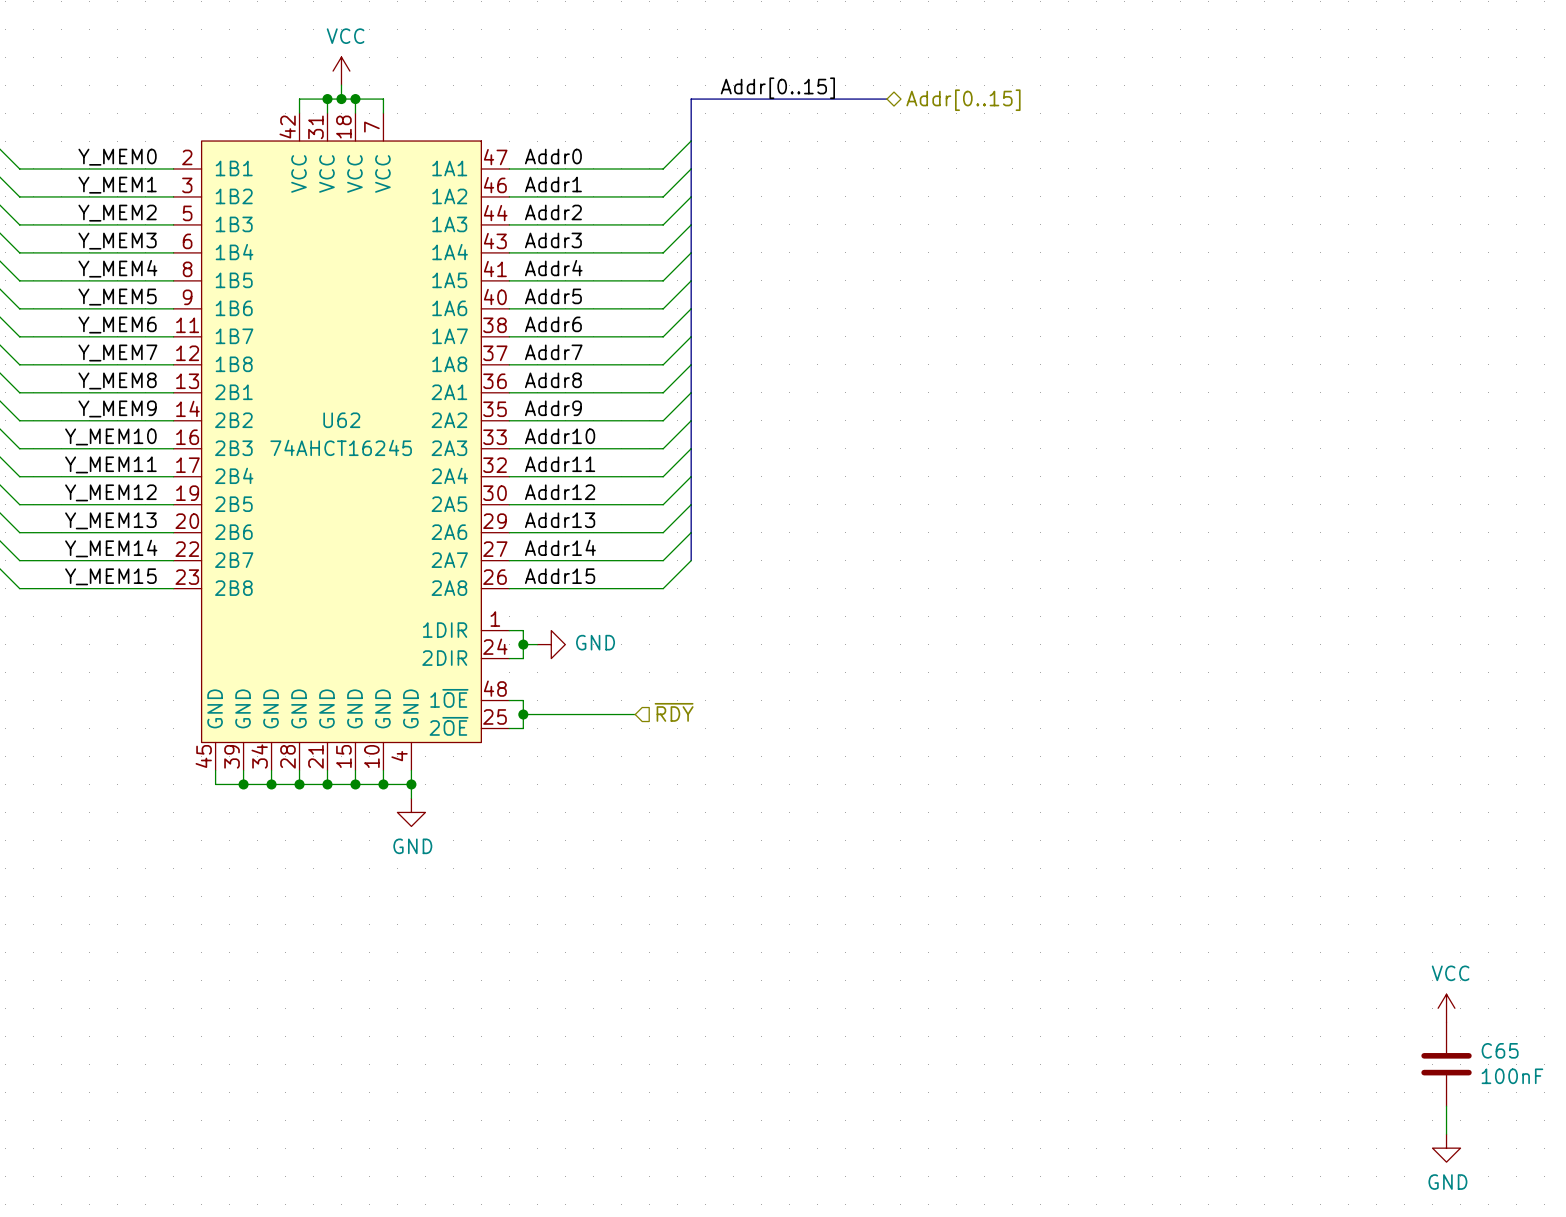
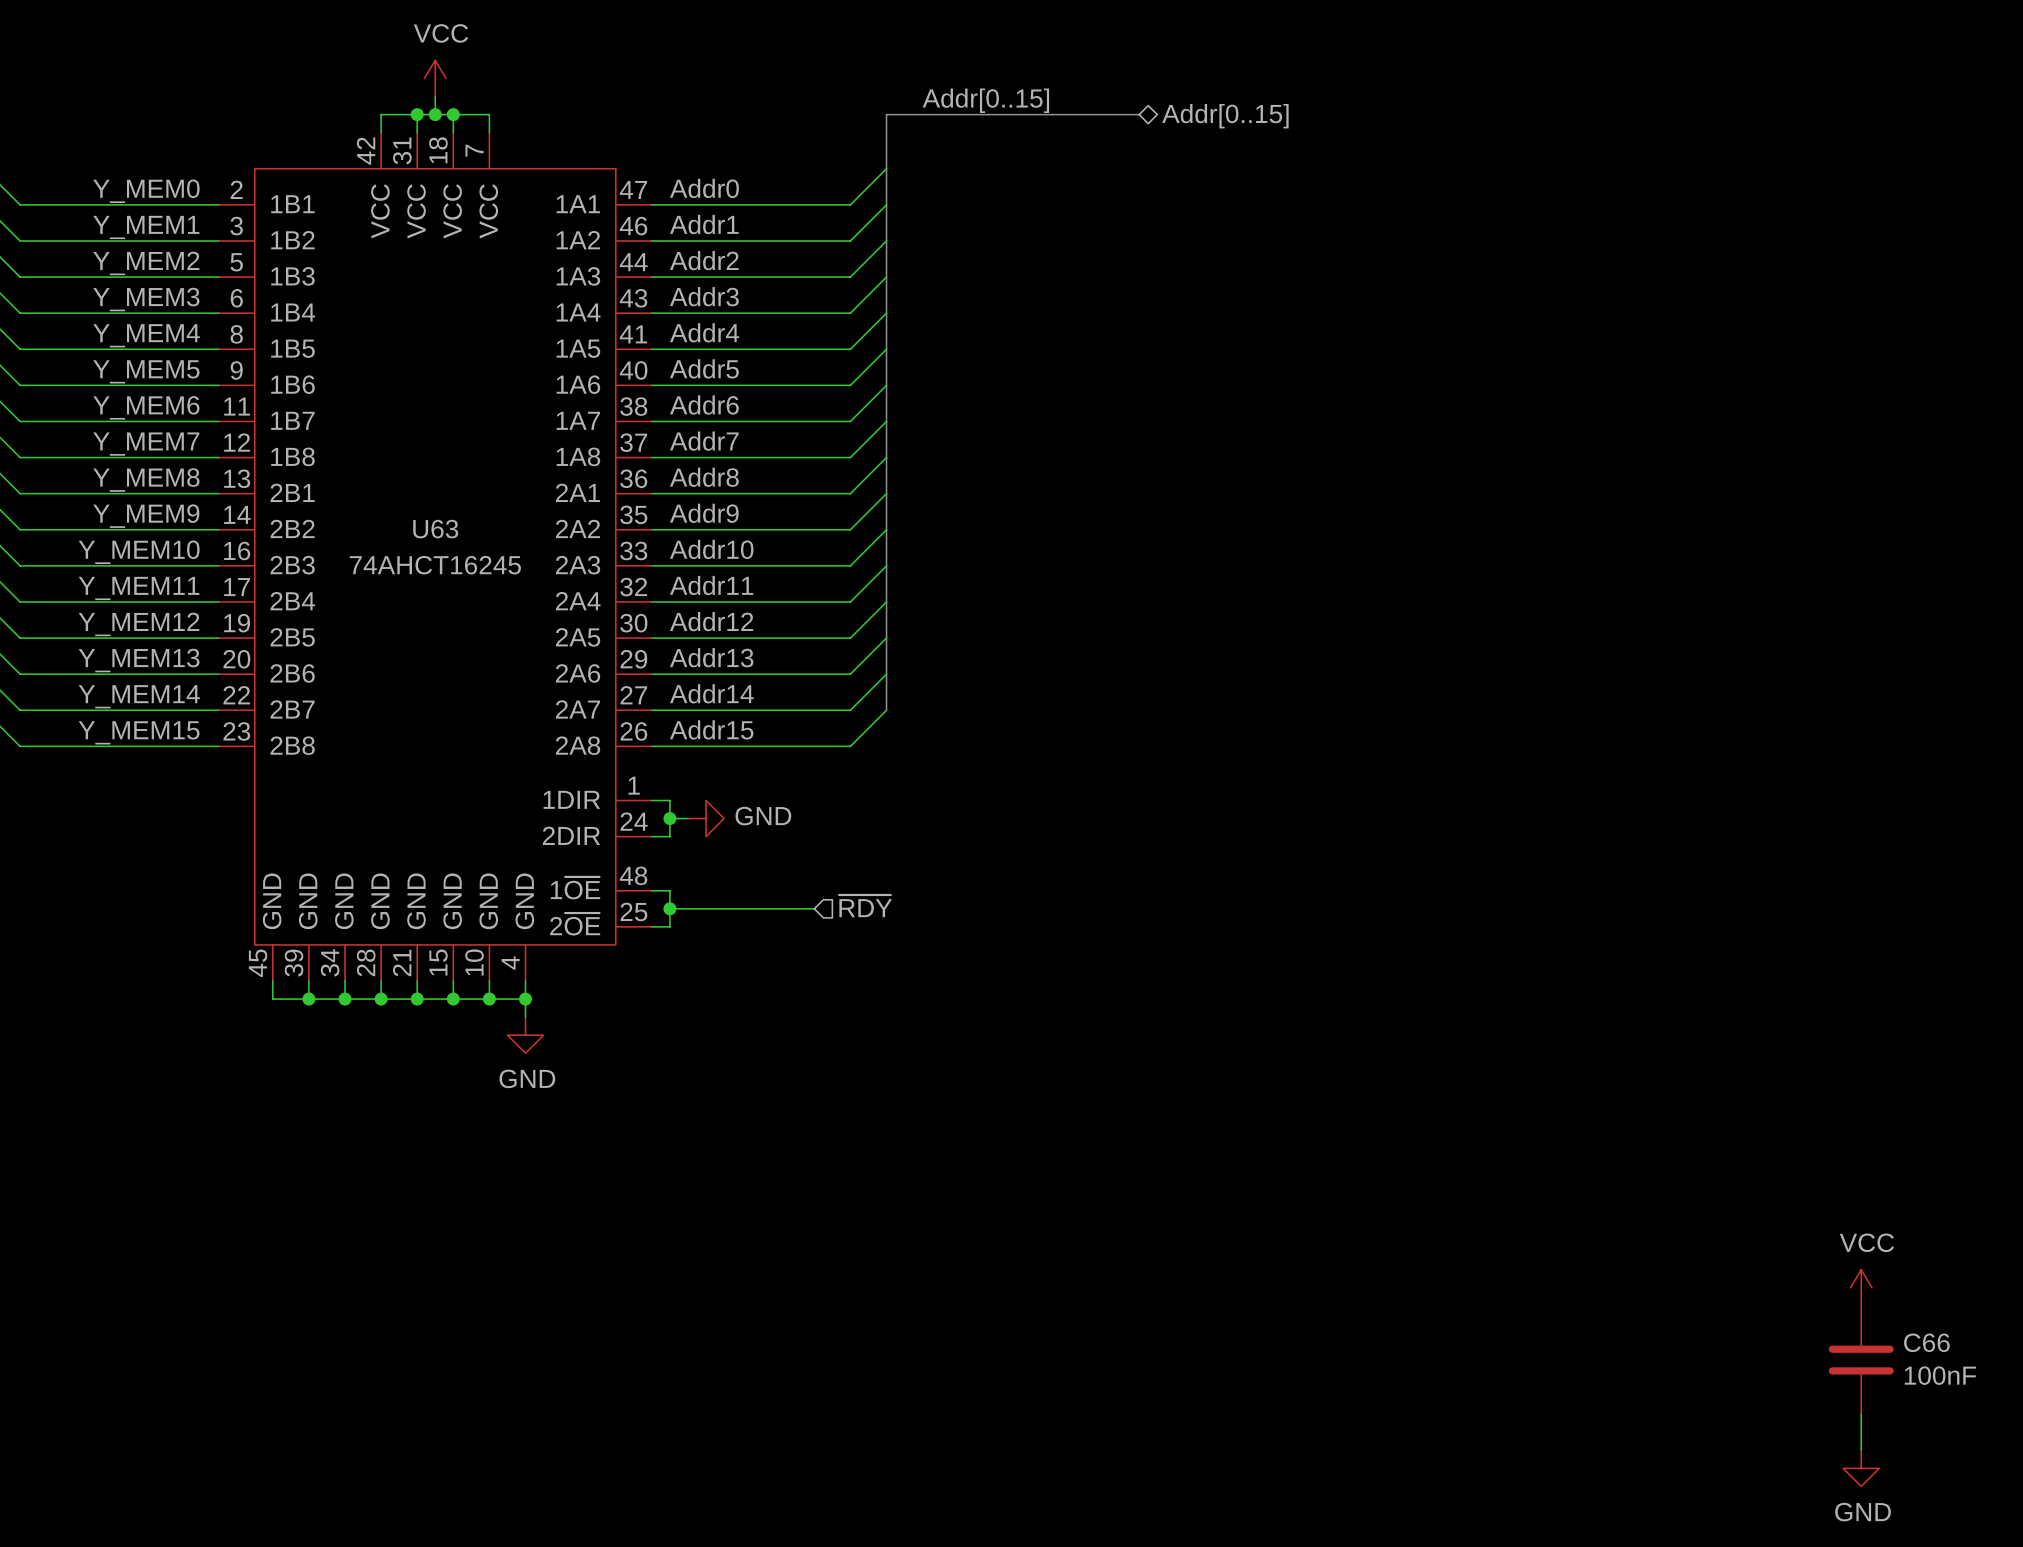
U62 name: U62 (341, 420) -> U63 (435, 529)
C65 name: C65 (1500, 1050) -> C66 (1926, 1342)

